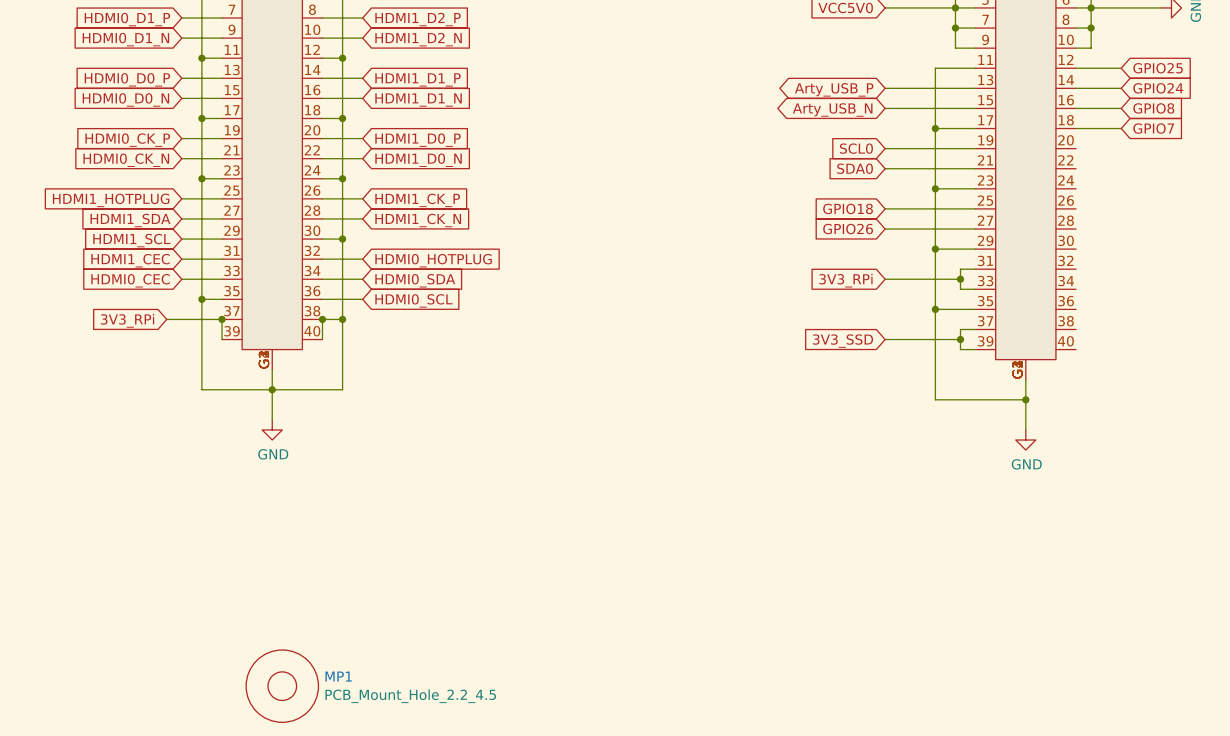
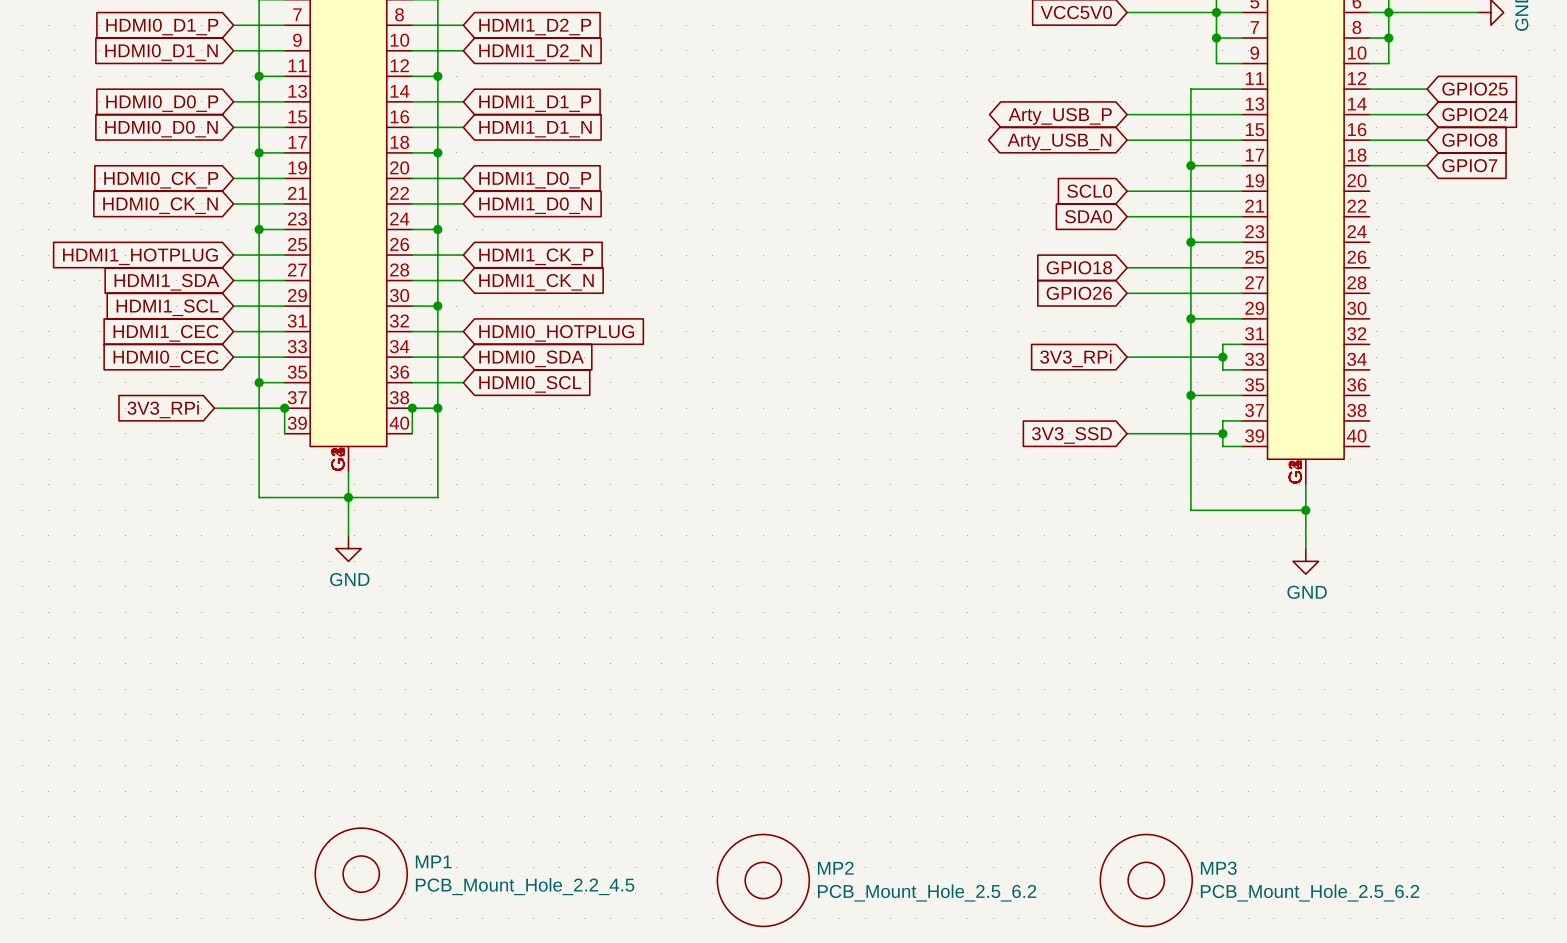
MP2: none -> PCB_Mount_Hole_2.5_6.2 (763, 880)
MP3: none -> PCB_Mount_Hole_2.5_6.2 (1146, 880)

